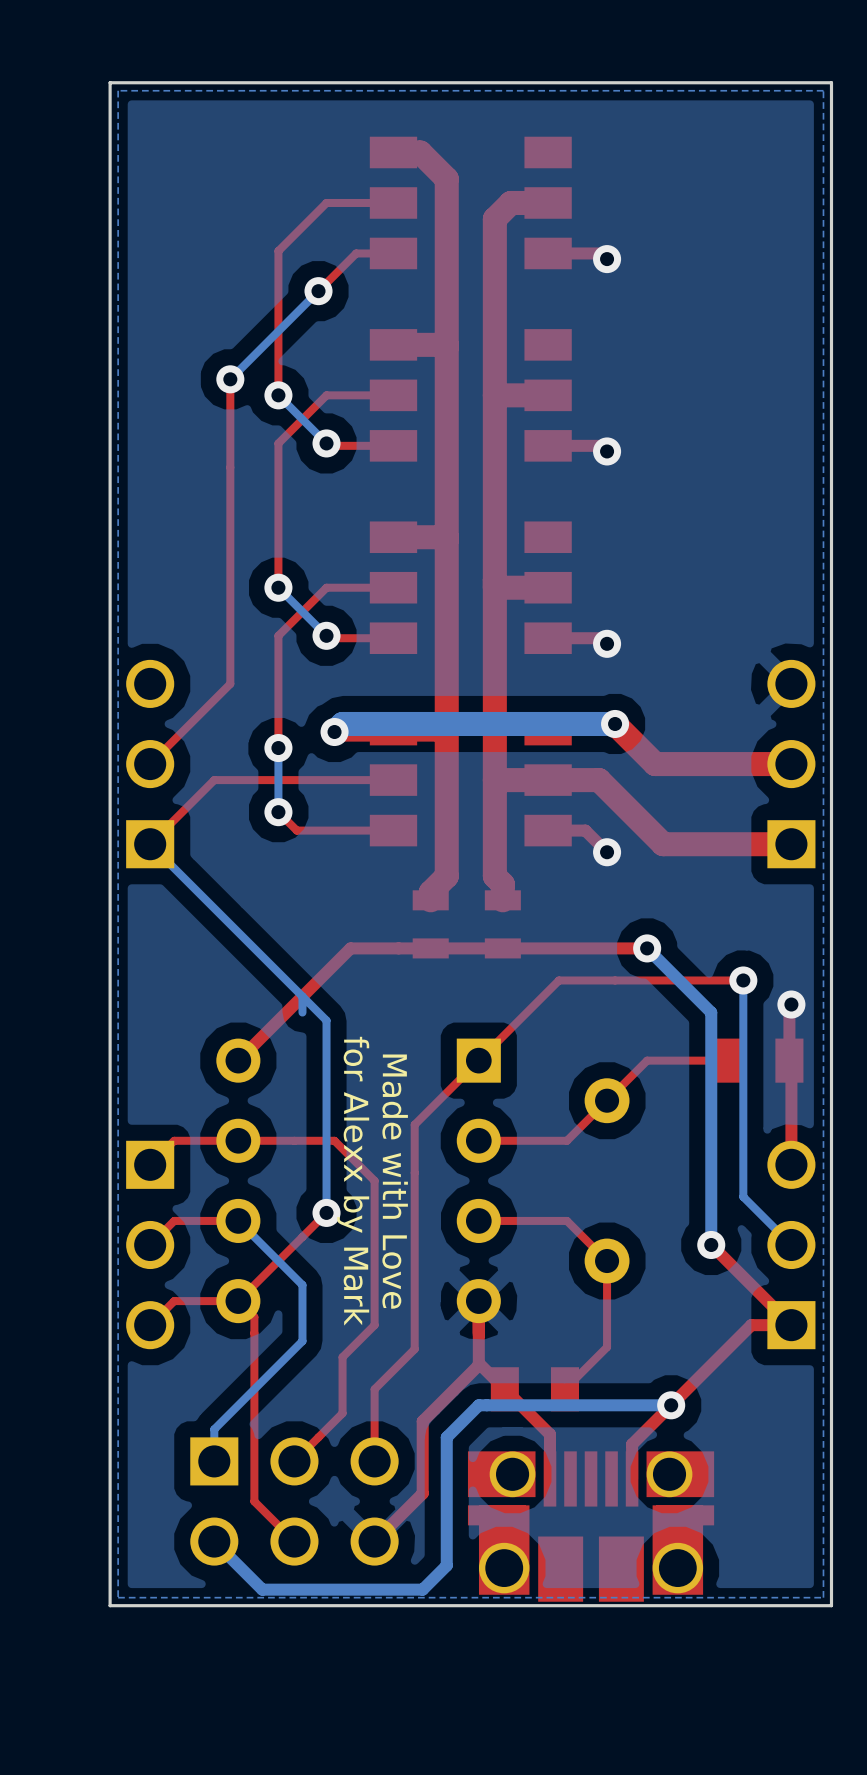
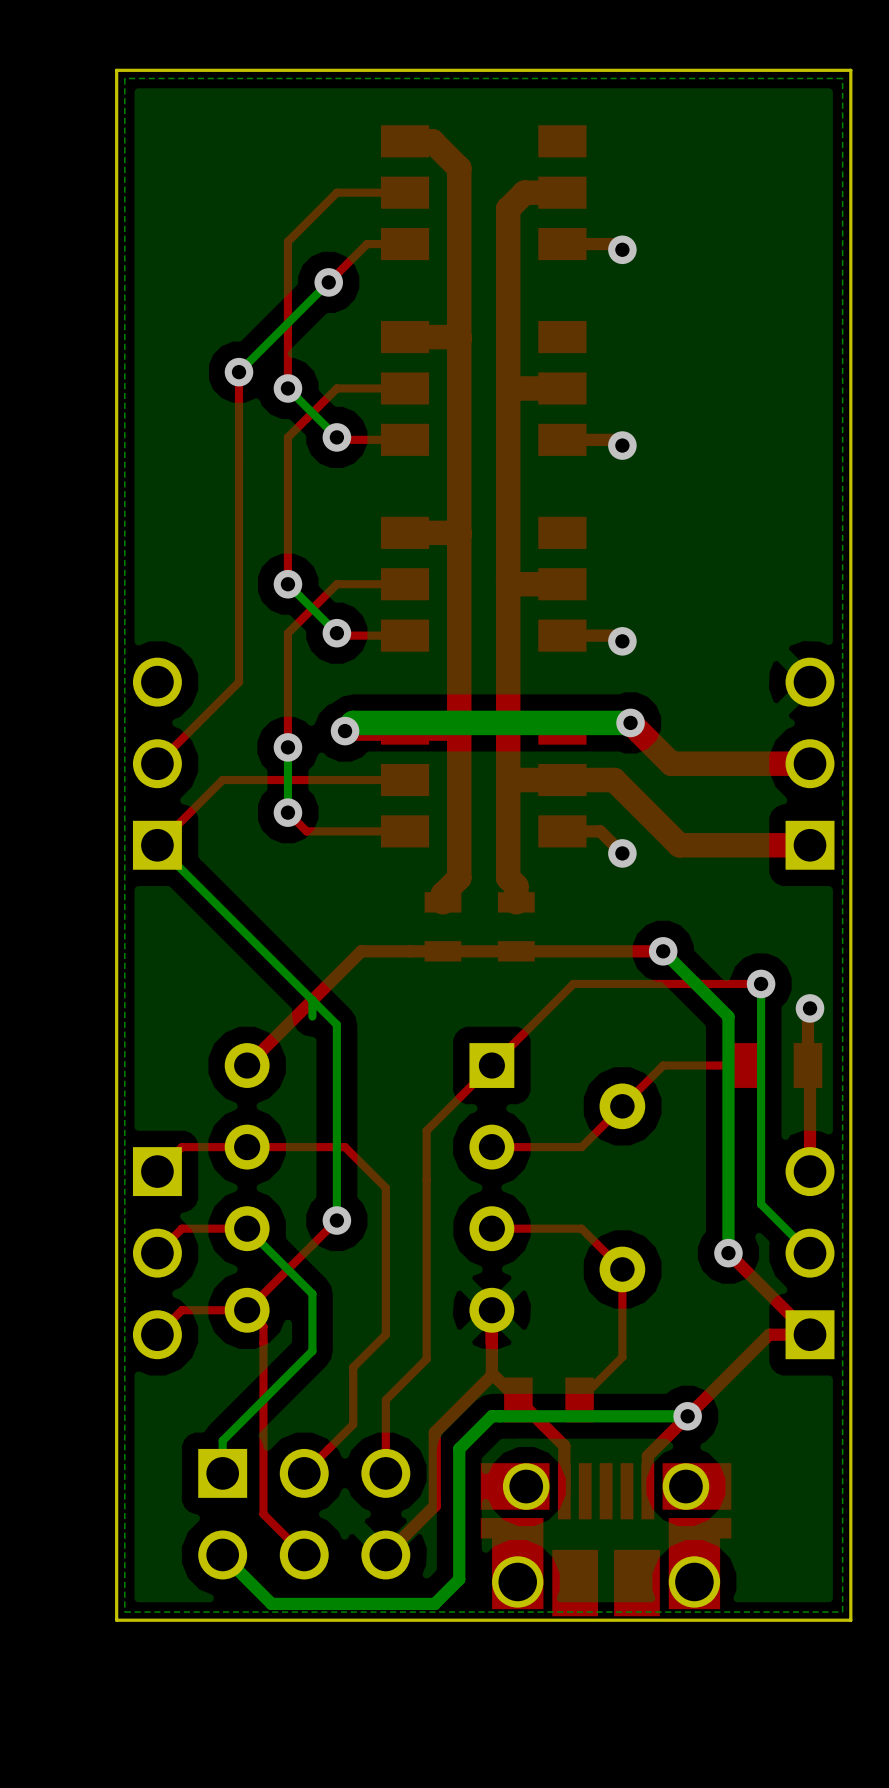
text: for Alexx by Mark (353, 1181) -> none
text: Made with Love (395, 1181) -> none

